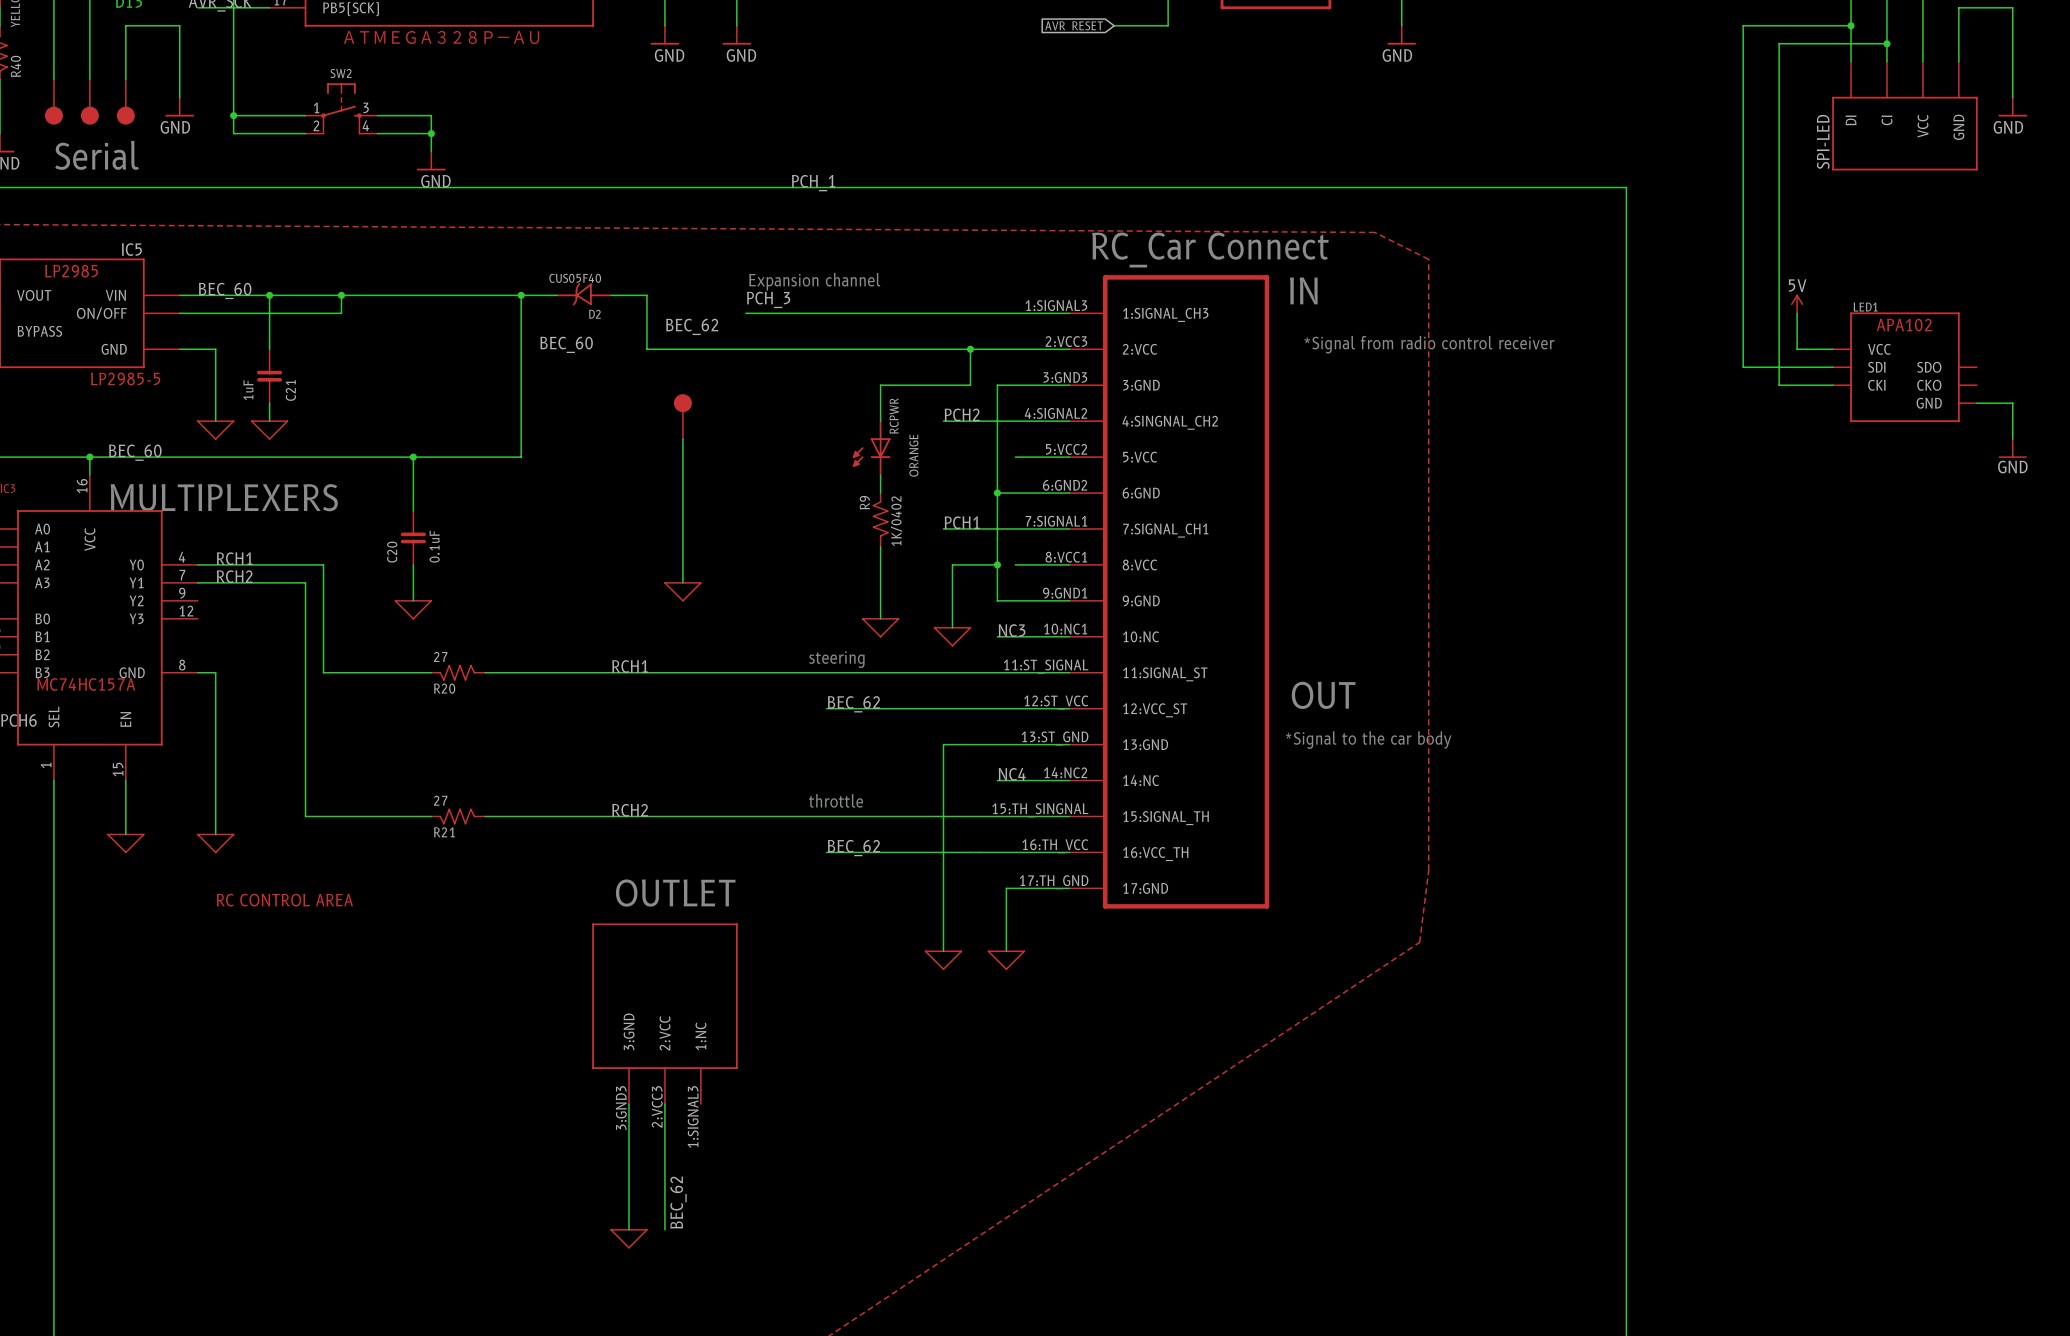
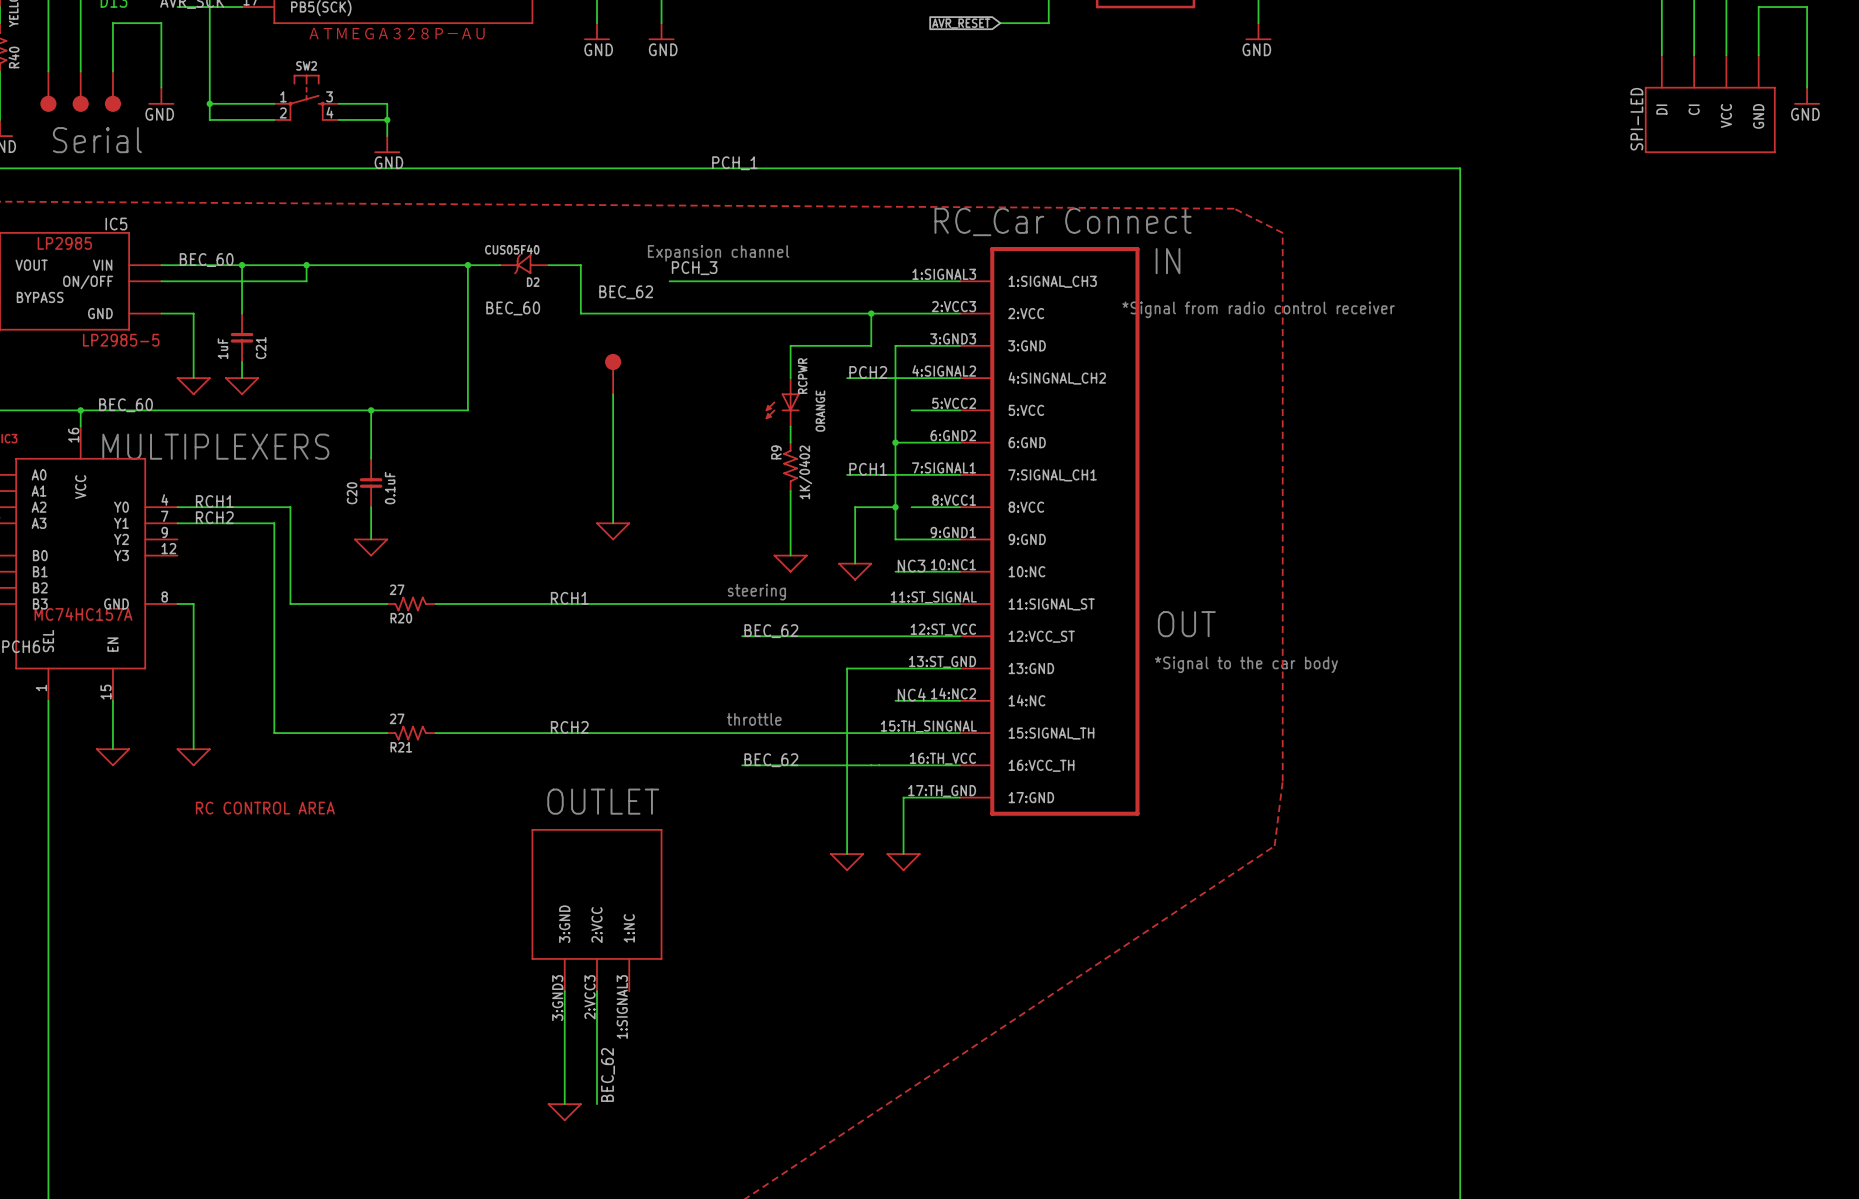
wire: (1851, 25) (1743, 25) (1743, 367) (1833, 367) -> none
junction: (1851, 25) -> none
wire: (1886, 43) (1779, 43) (1779, 385) (1833, 385) -> none
junction: (1886, 43) -> none
power symbol: 5V (1797, 304) -> none
wire: (1797, 313) (1797, 349) (1833, 349) -> none
LED1: (1904, 367) -> none
wire: (1976, 403) (2012, 403) (2012, 439) -> none
power symbol: GND (2012, 448) -> none

